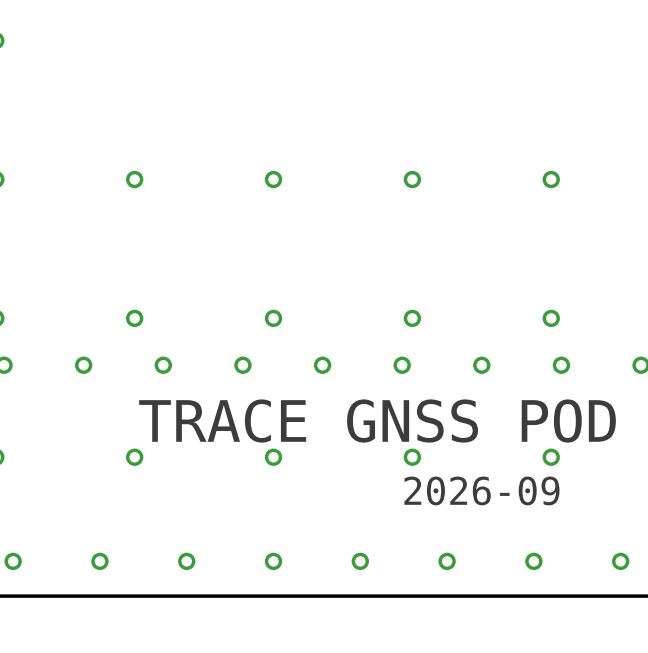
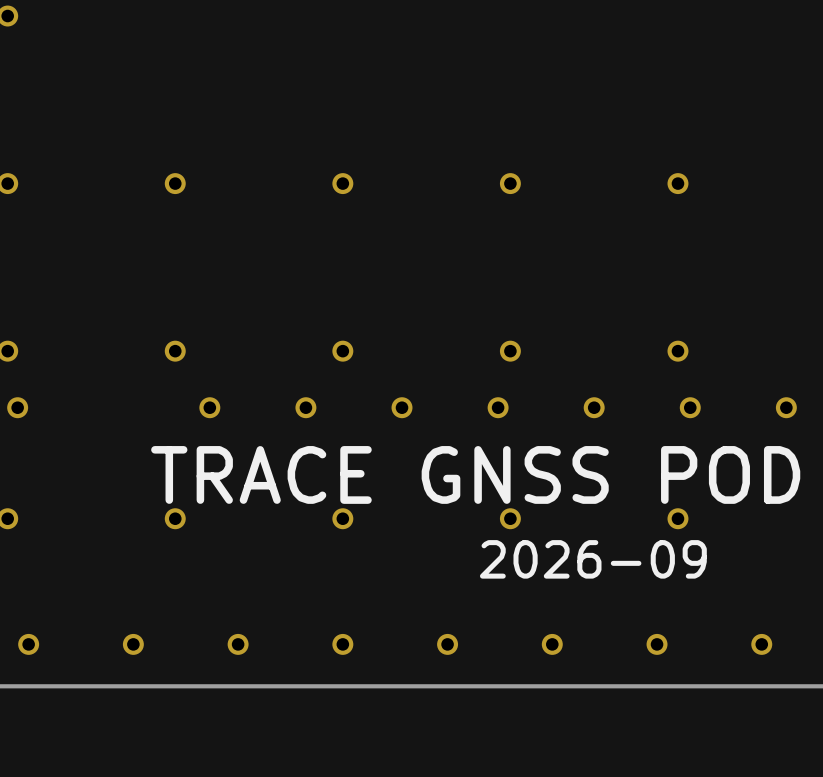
via: (83, 365) -> none

